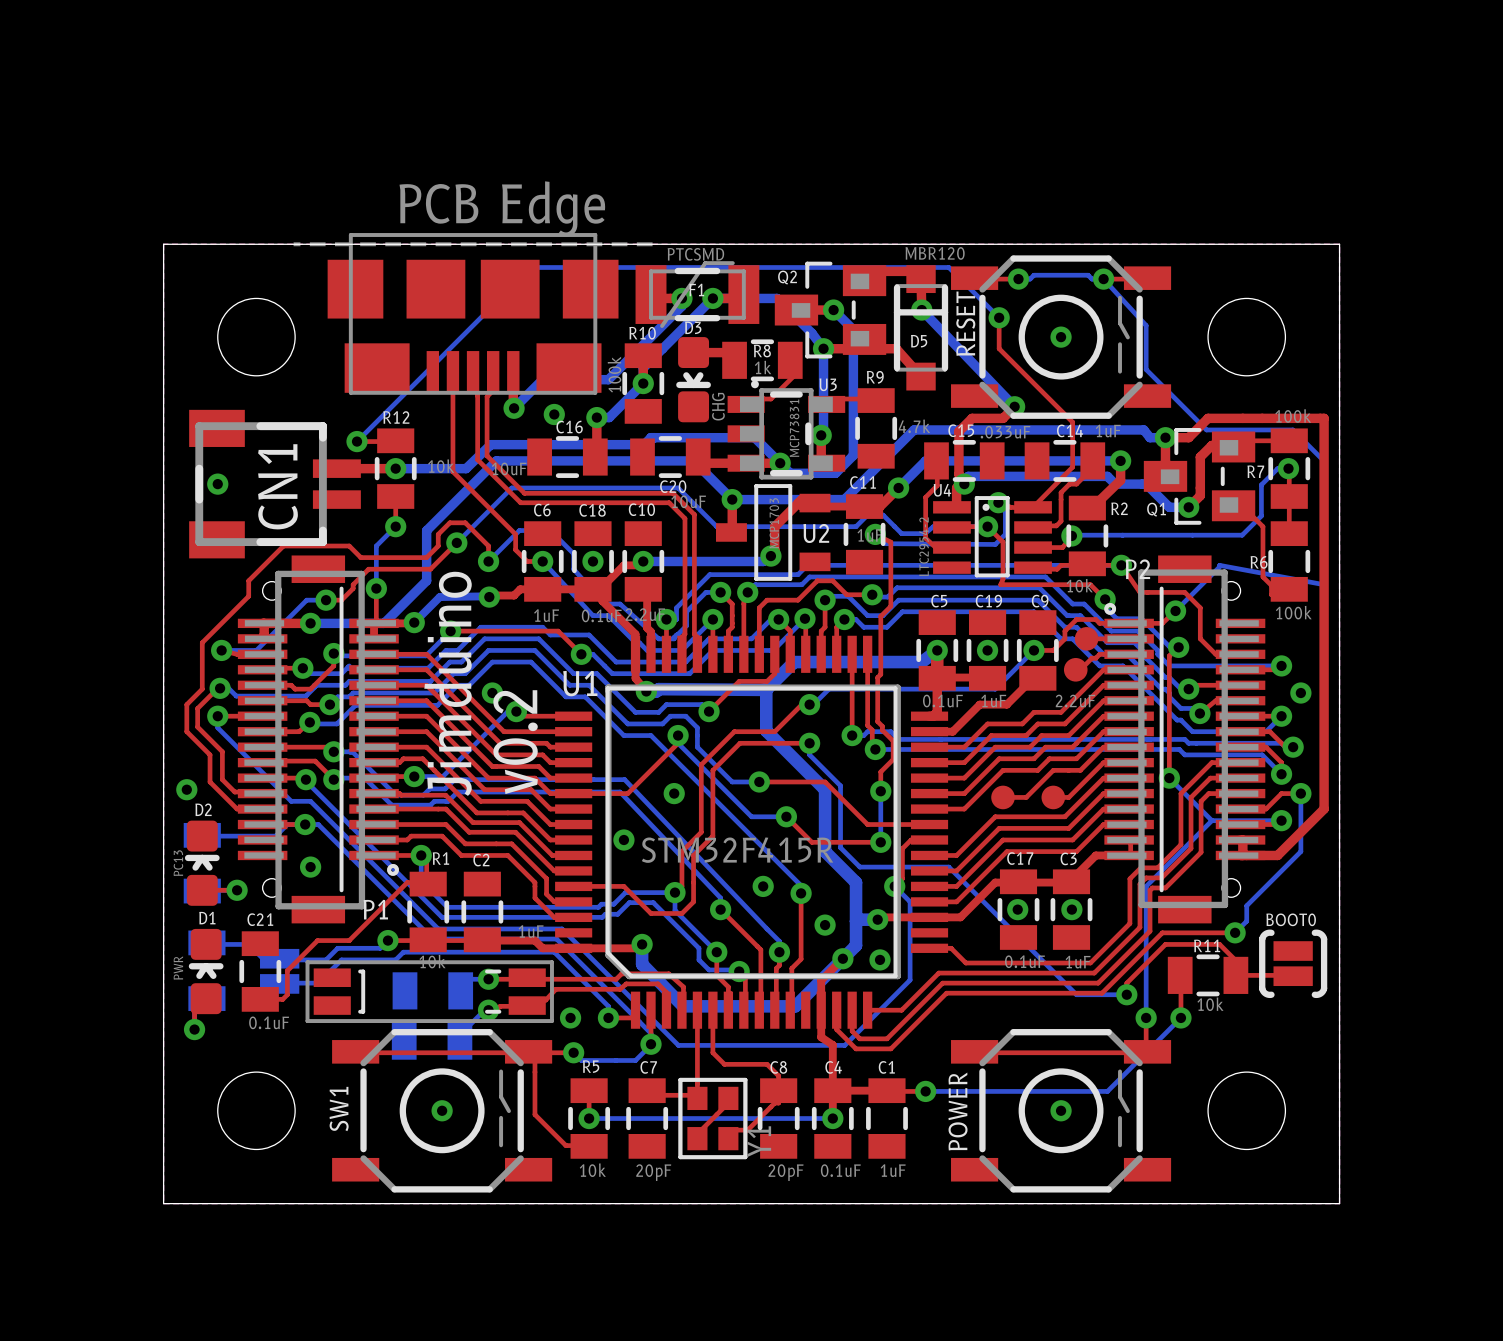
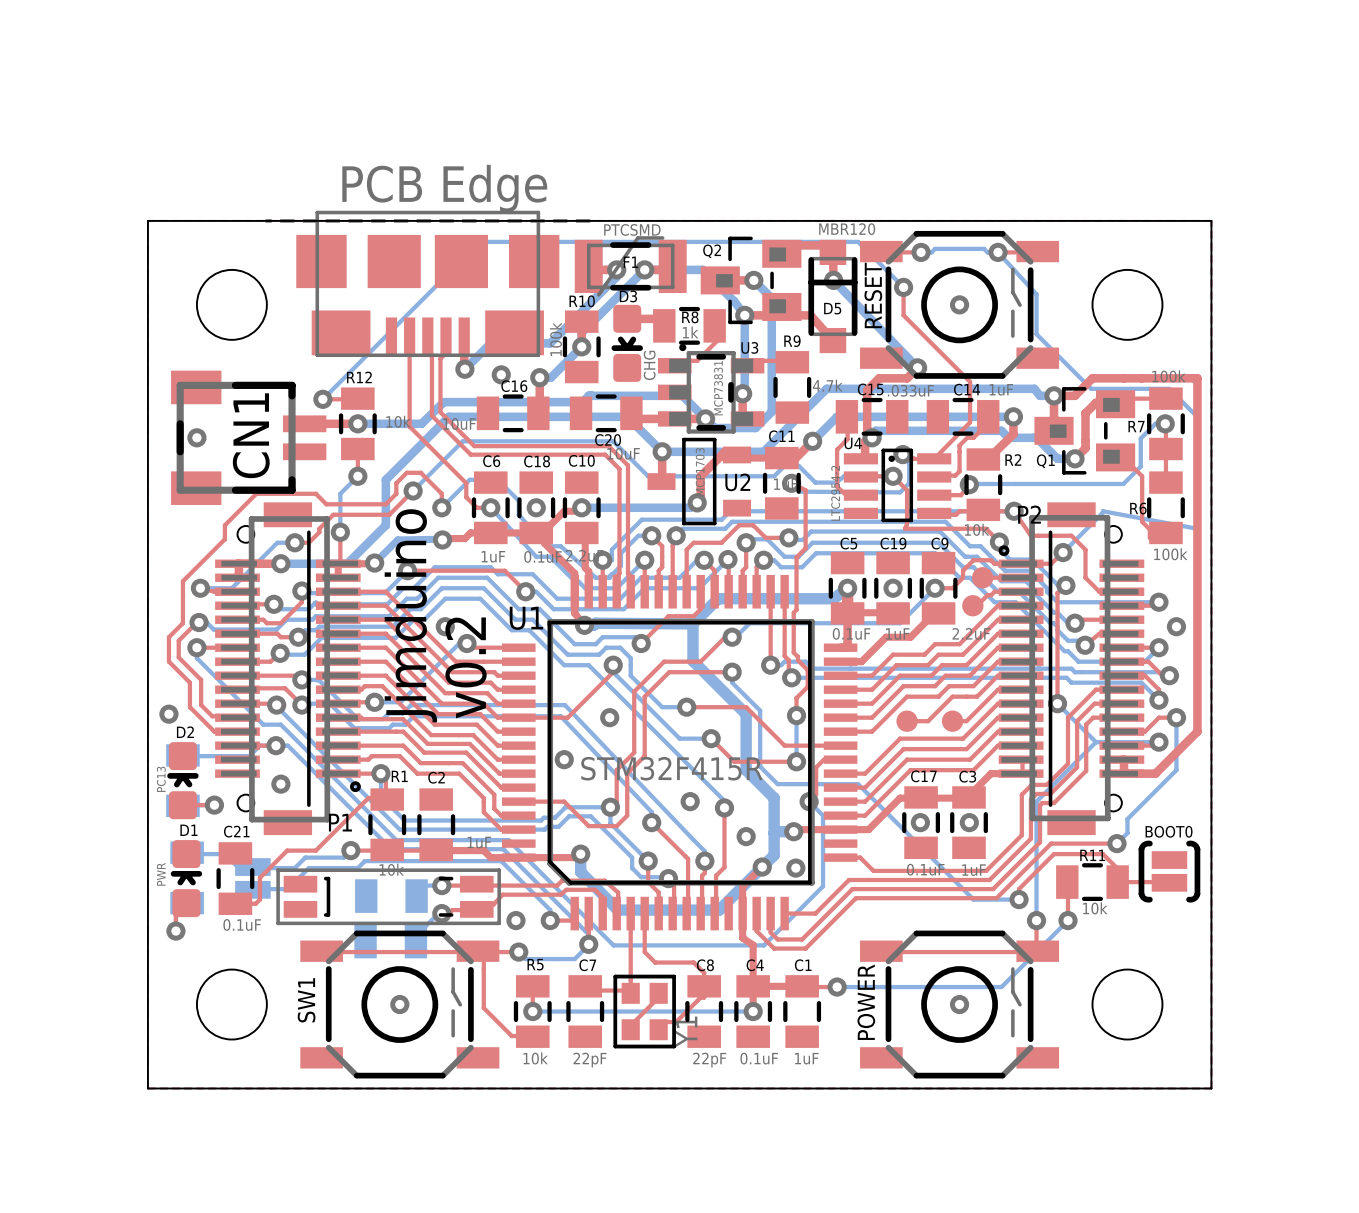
C7 value: 20pF (653, 1172) -> 22pF (590, 1060)
C8 value: 20pF (786, 1172) -> 22pF (709, 1060)

